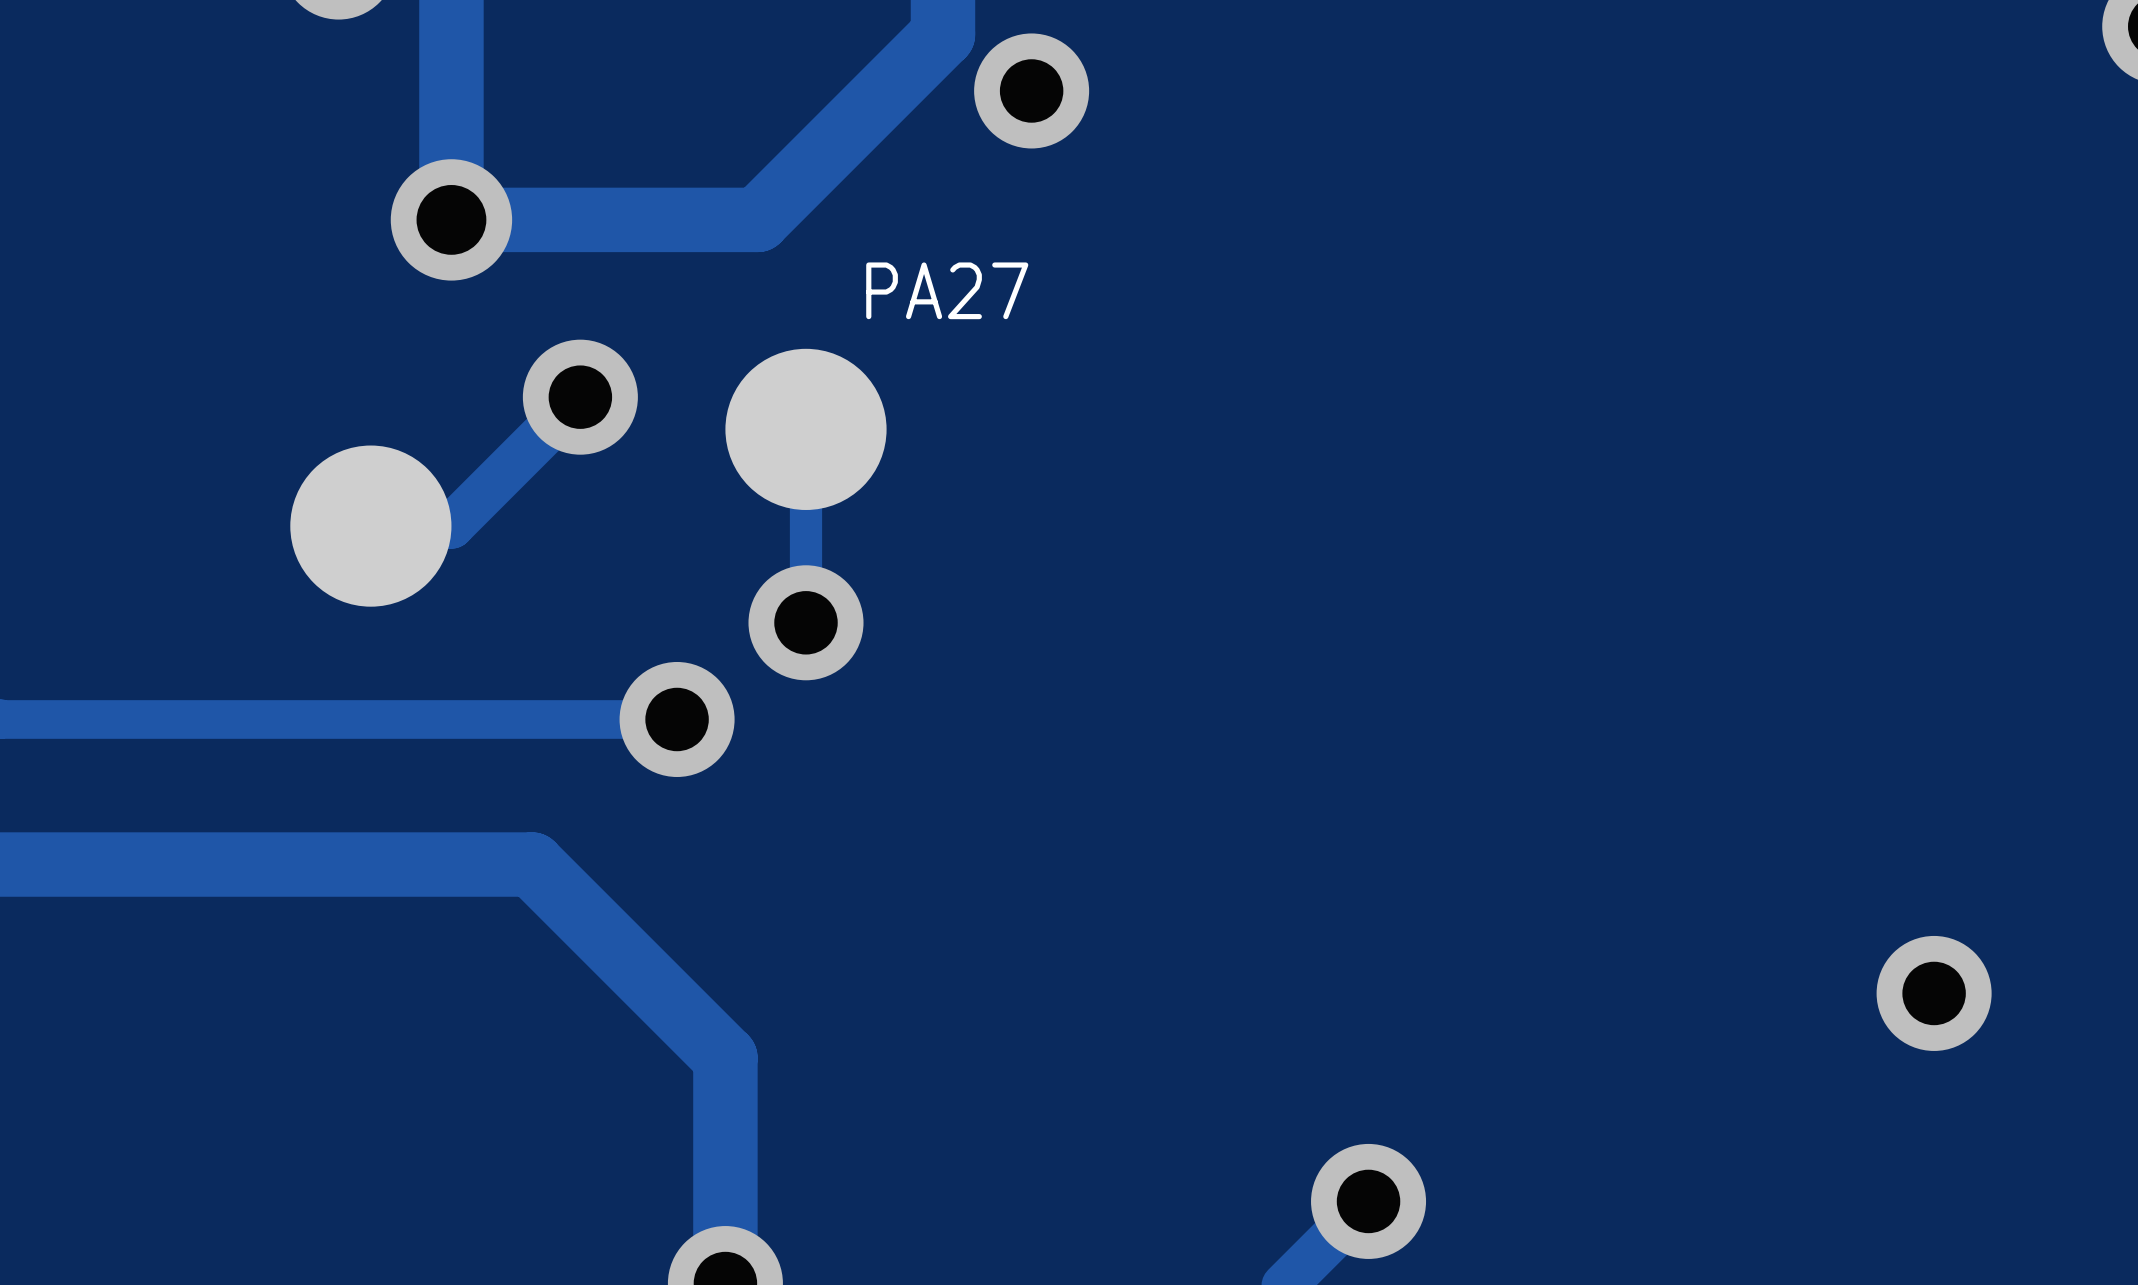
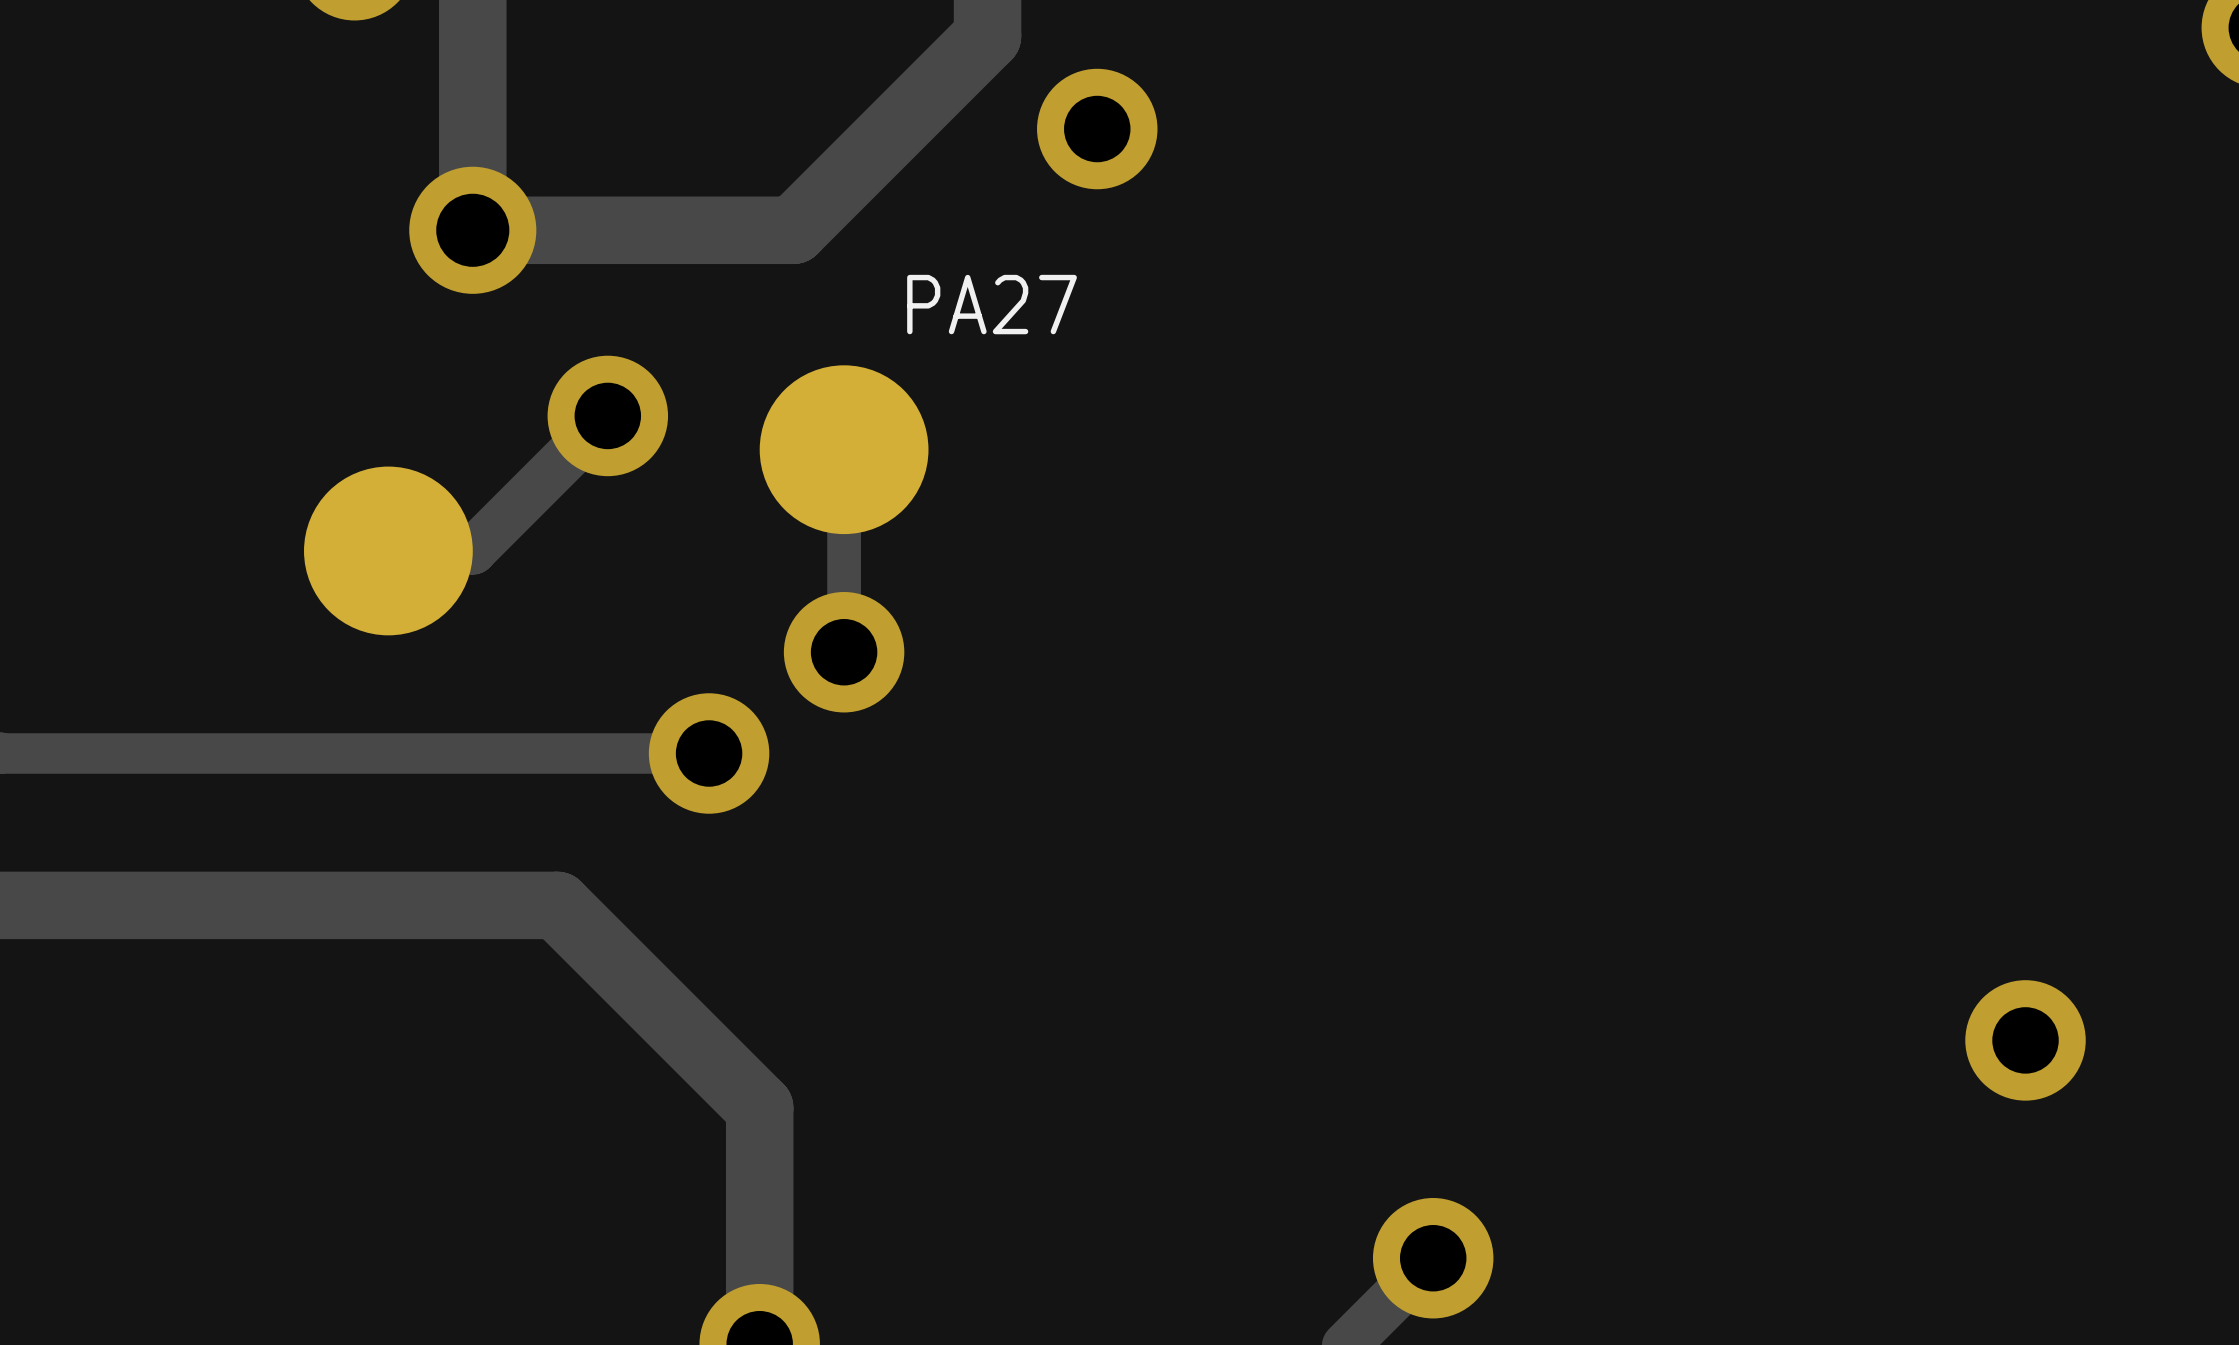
via position: (1031, 90) -> (1097, 129)

